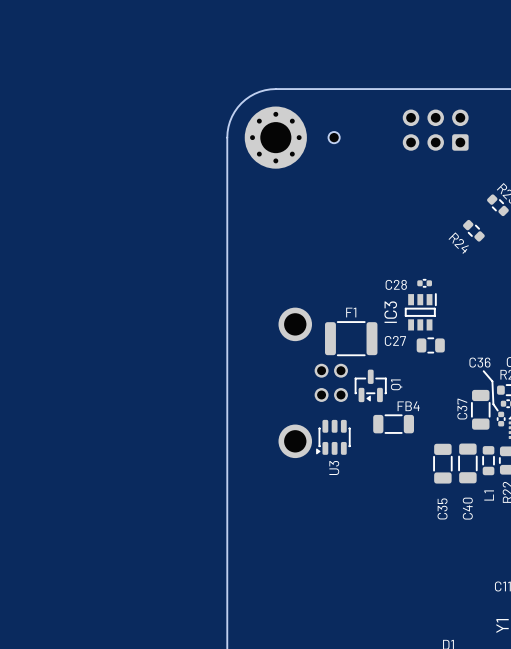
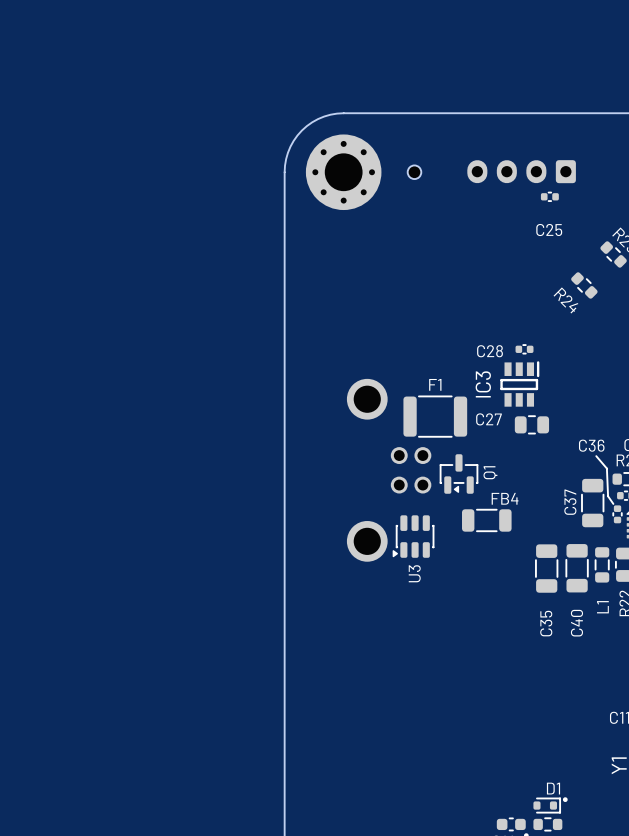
part: (435, 130) -> none
part: none -> (521, 171)
C25: none -> (549, 196)

